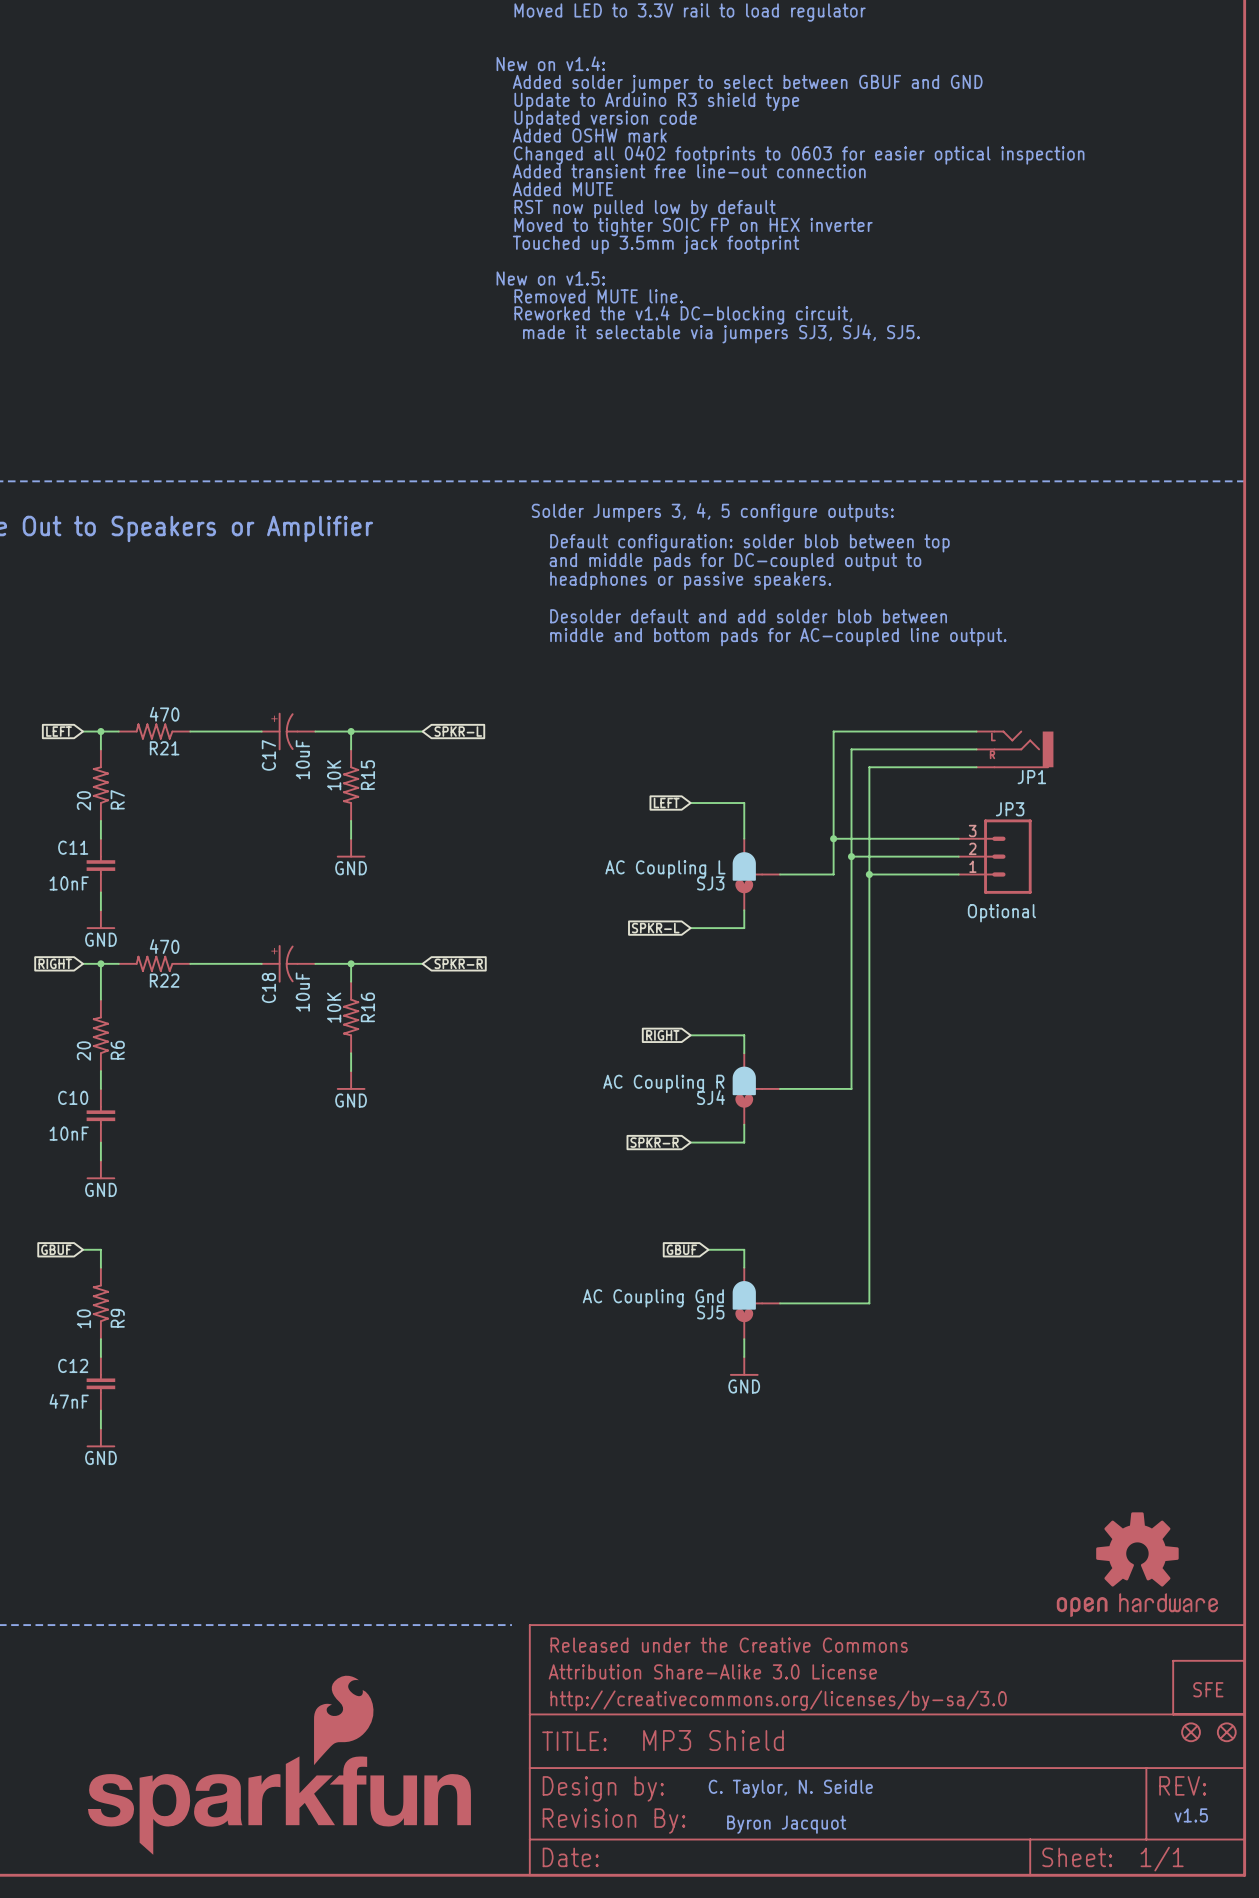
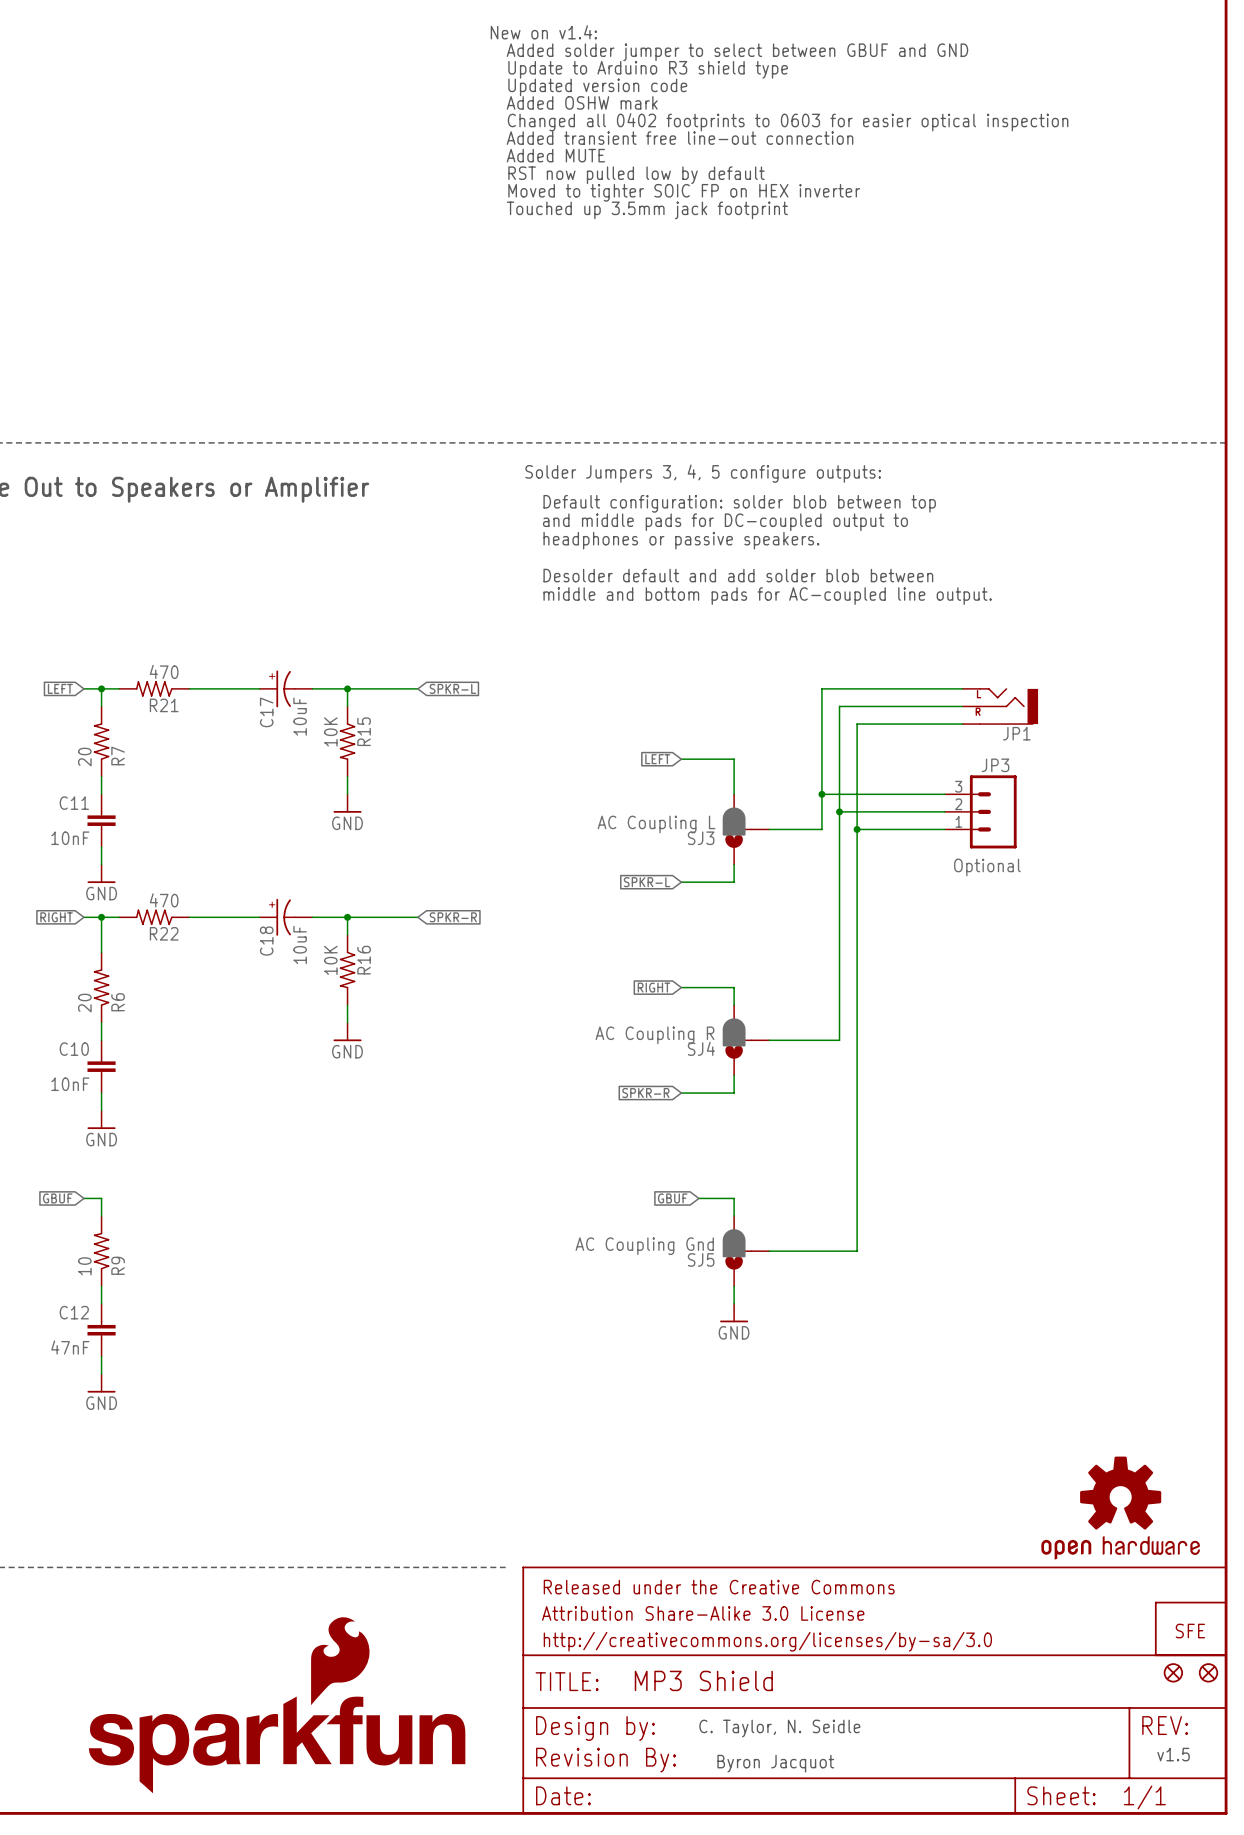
text: New on v1.5: (550, 278) -> none
text: Removed MUTE line. (598, 296) -> none
text: Reworked the v1.4 DC-blocking circuit, (683, 315) -> none
text: made it selectable via jumpers SJ3, SJ4, SJ5. (721, 333) -> none

